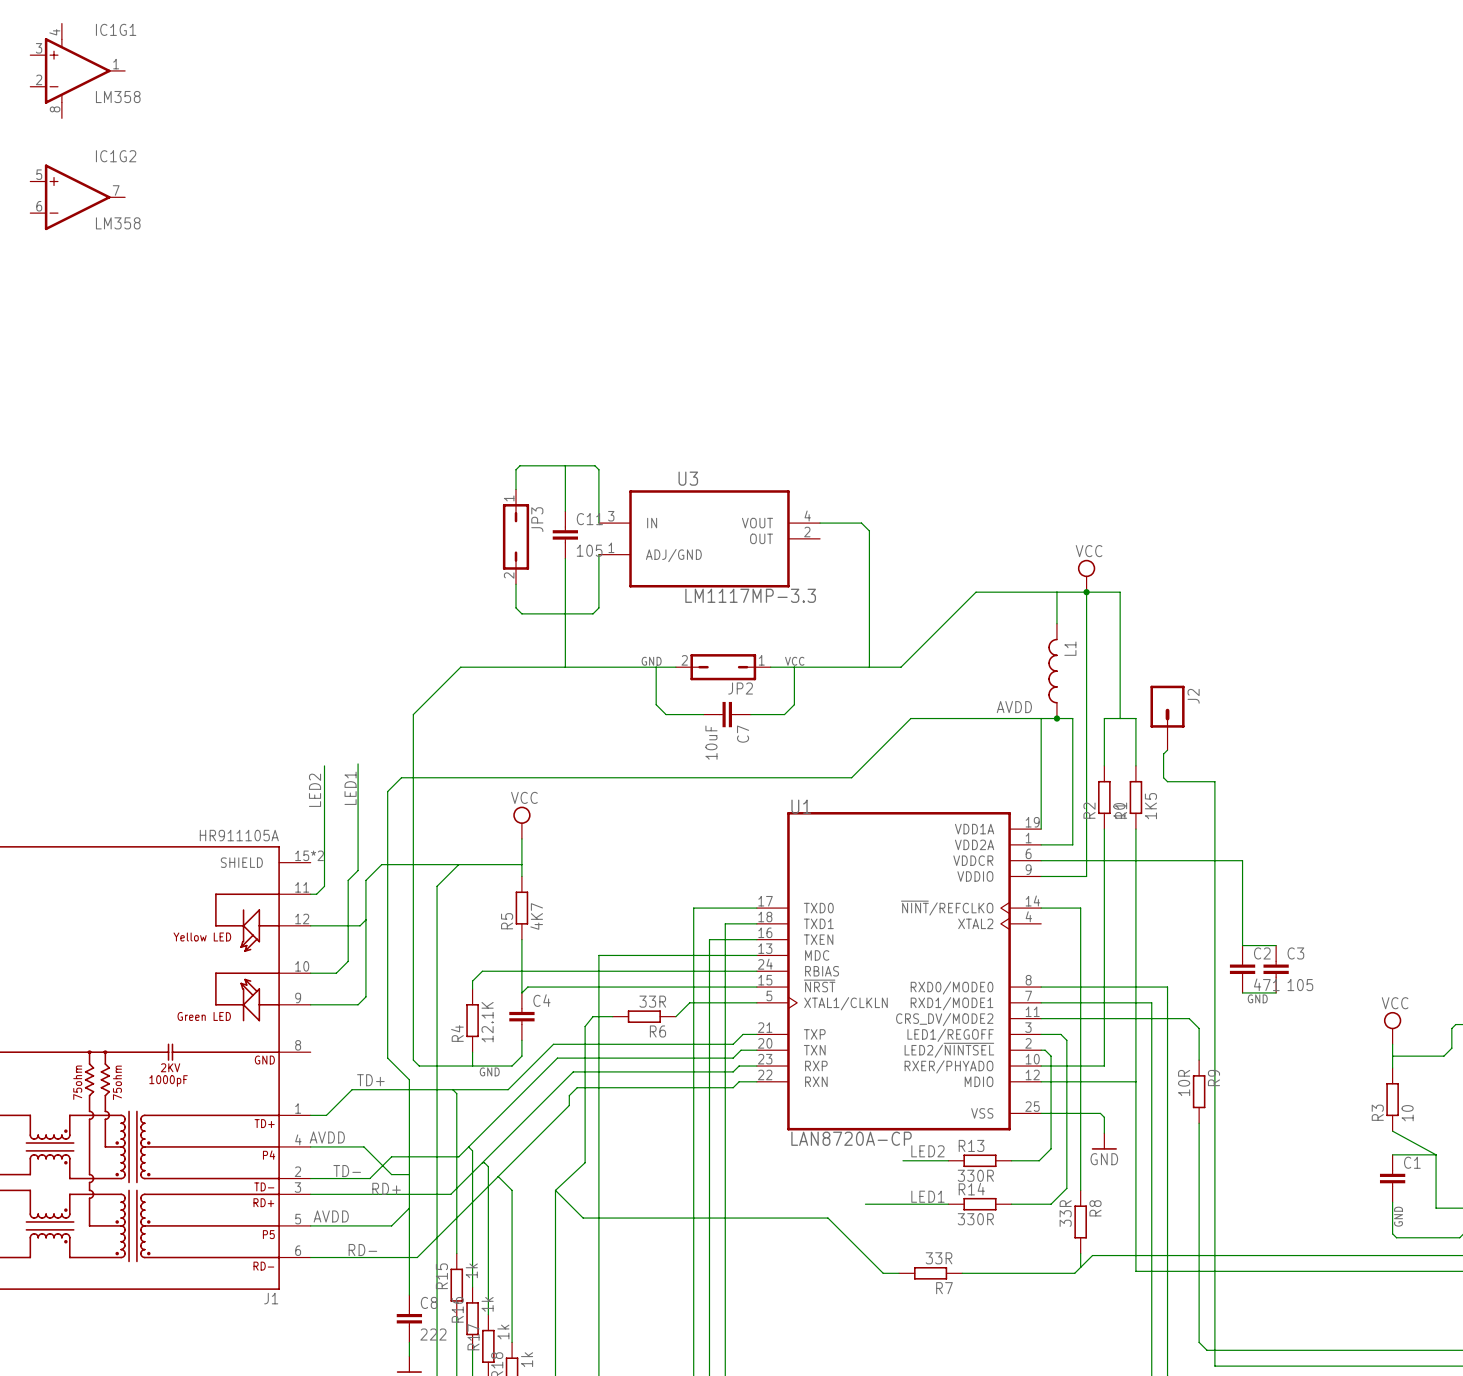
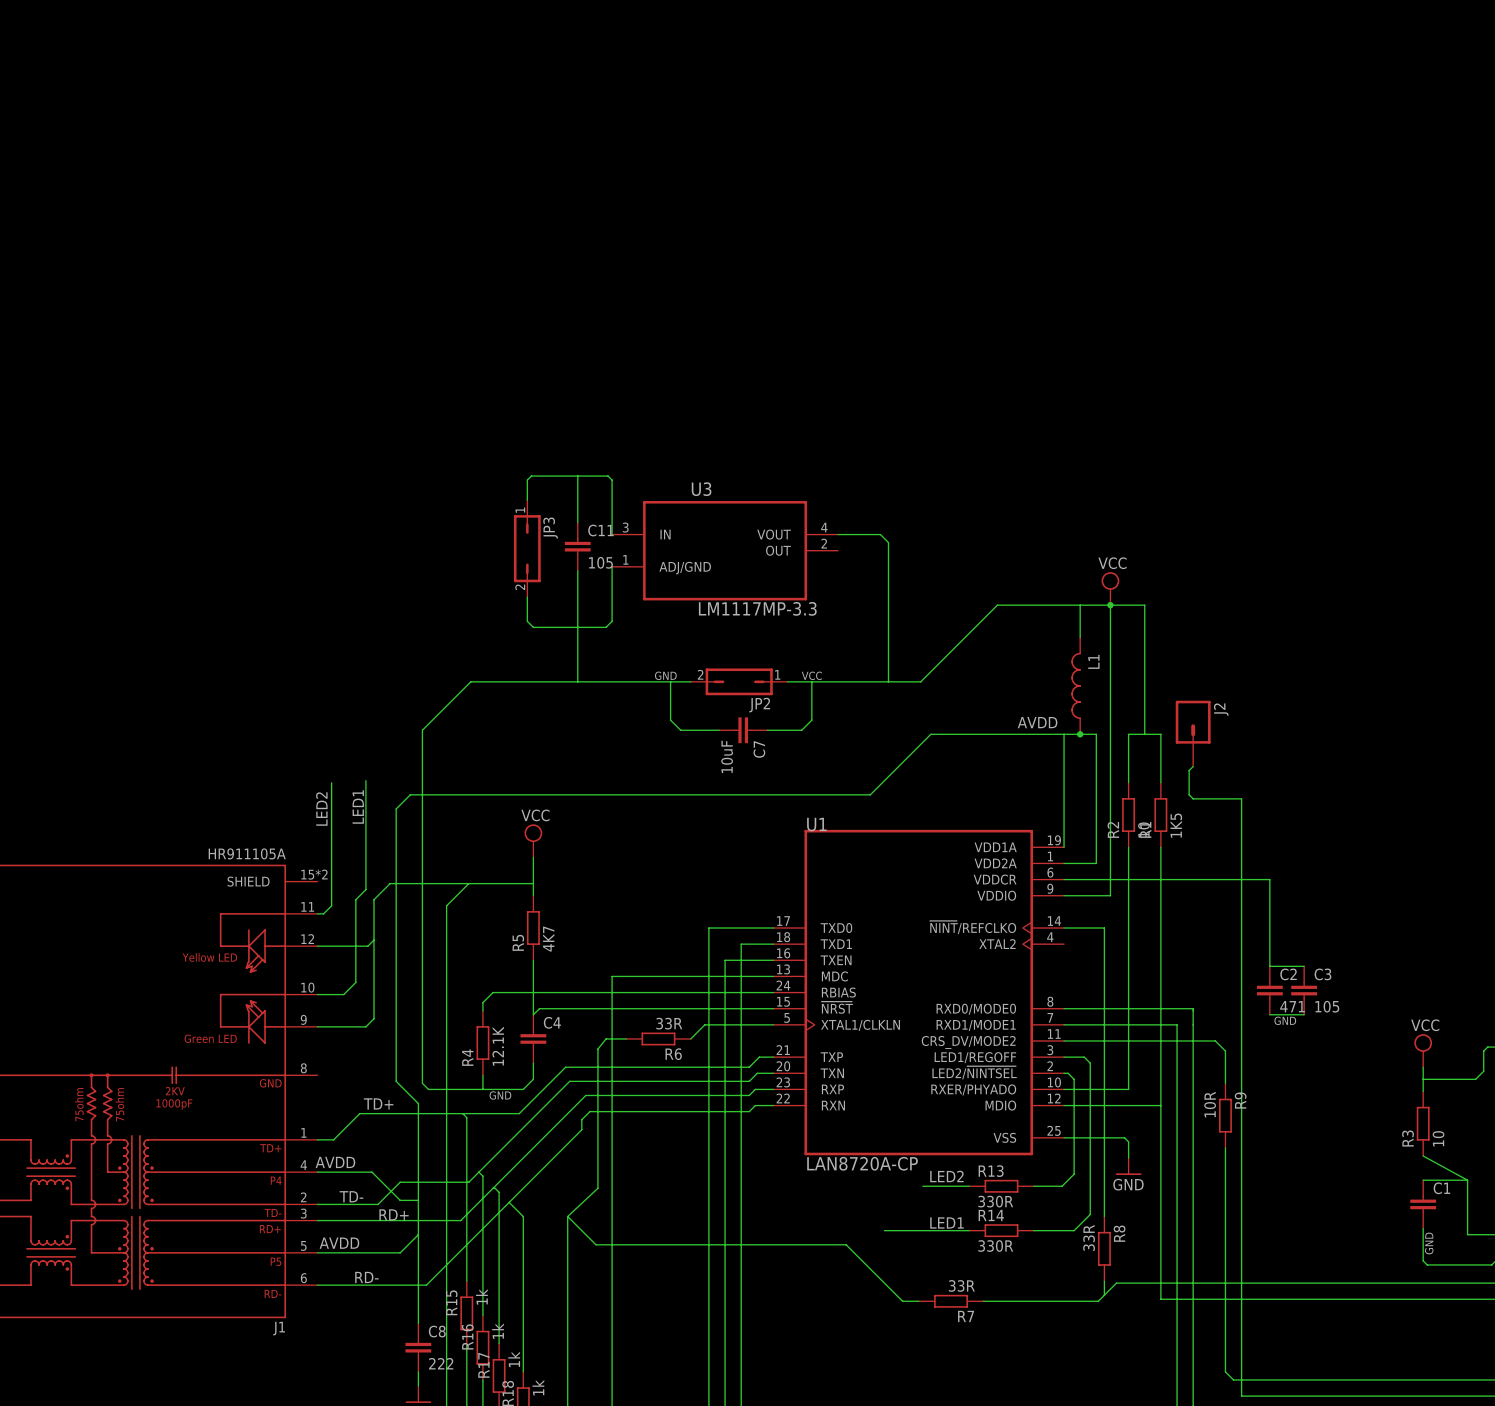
IC1G1: LM358 (77, 70) -> none
IC1G2: LM358 (77, 197) -> none

